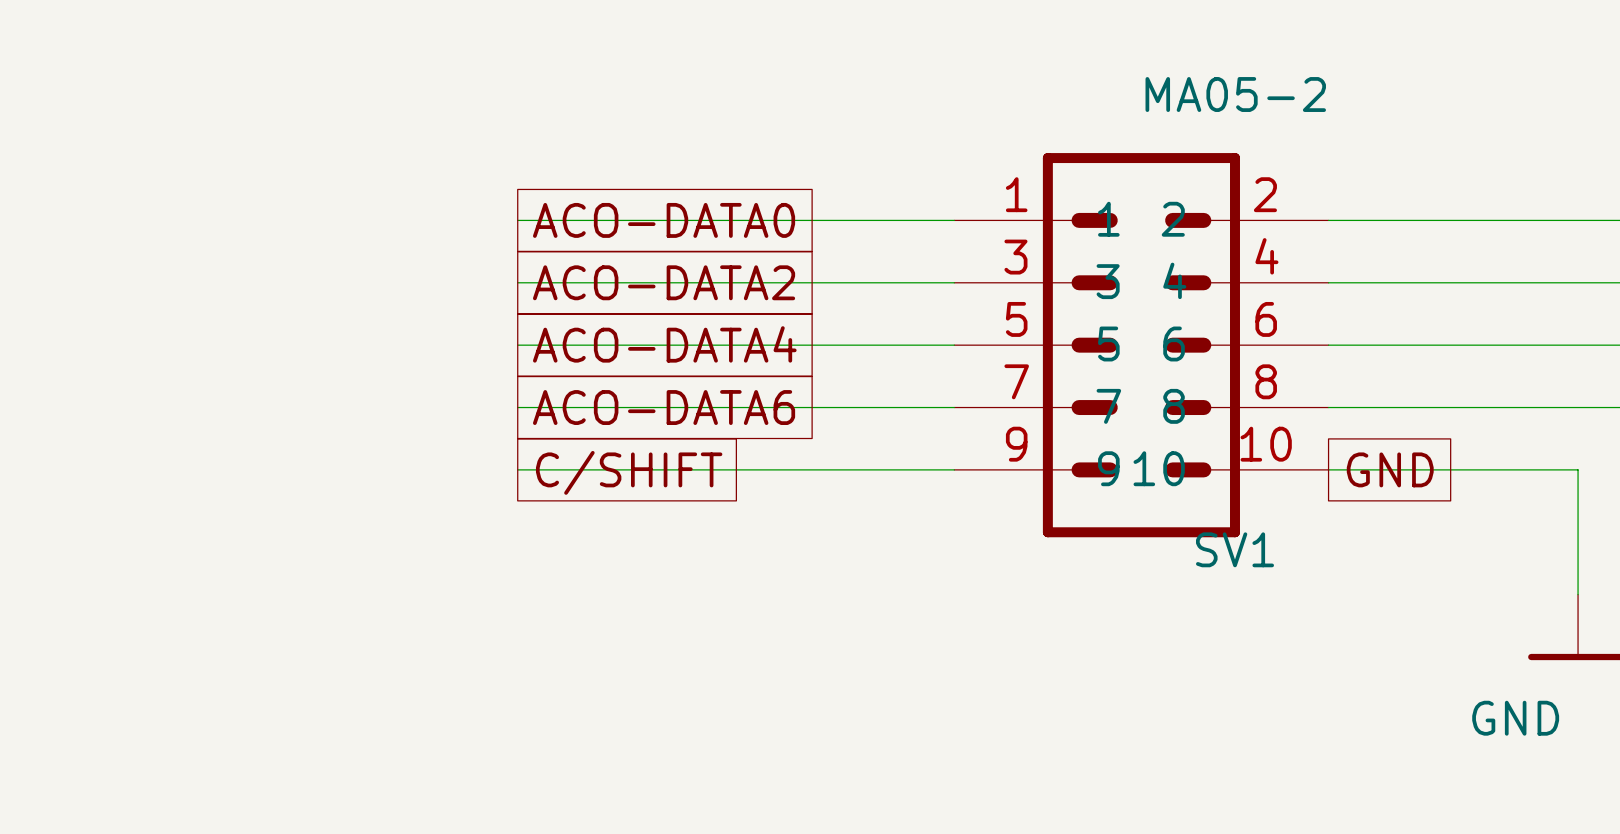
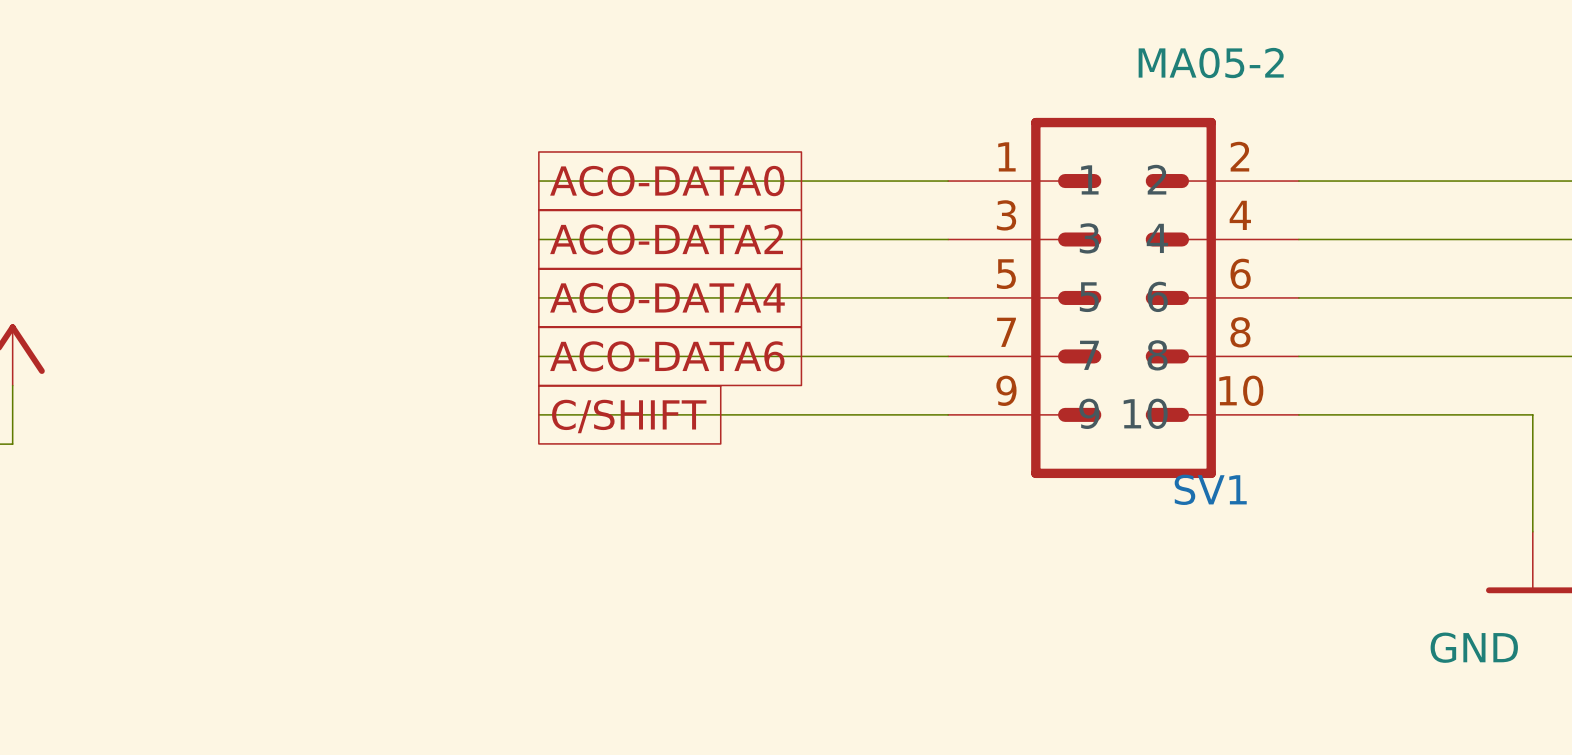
global label: GND (1390, 469) -> none

